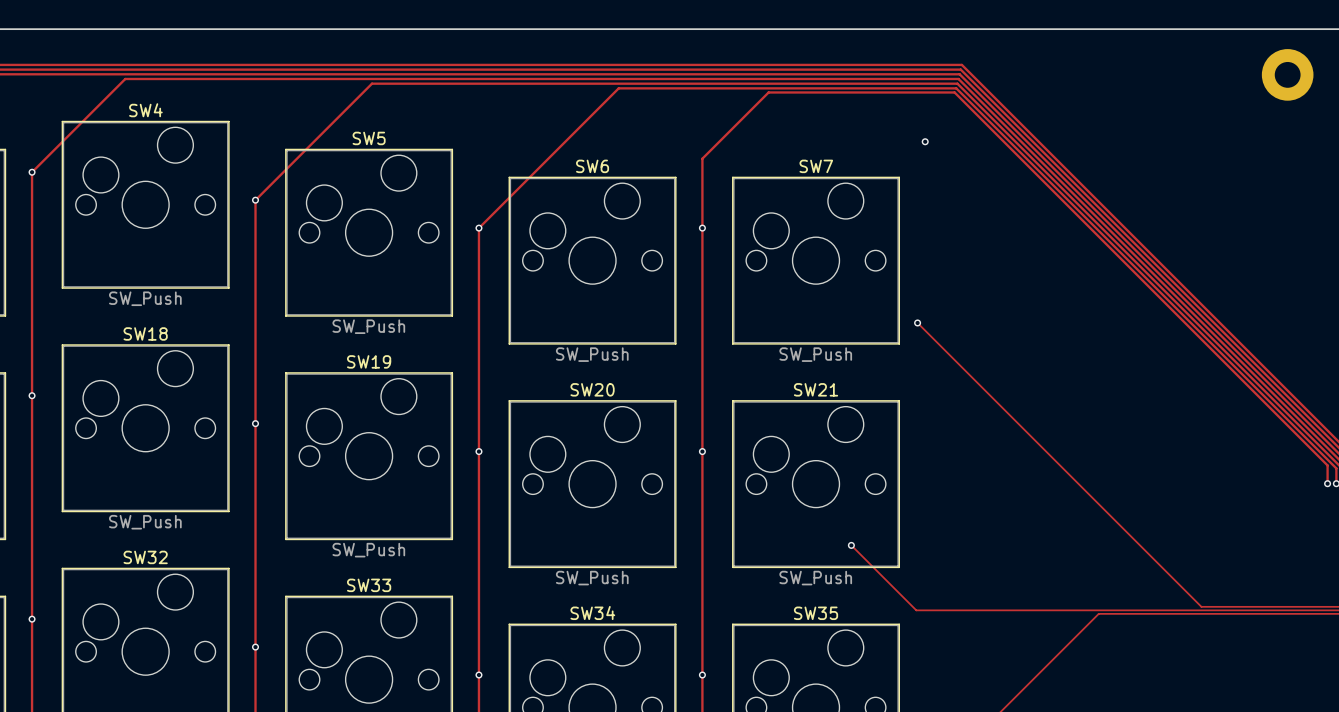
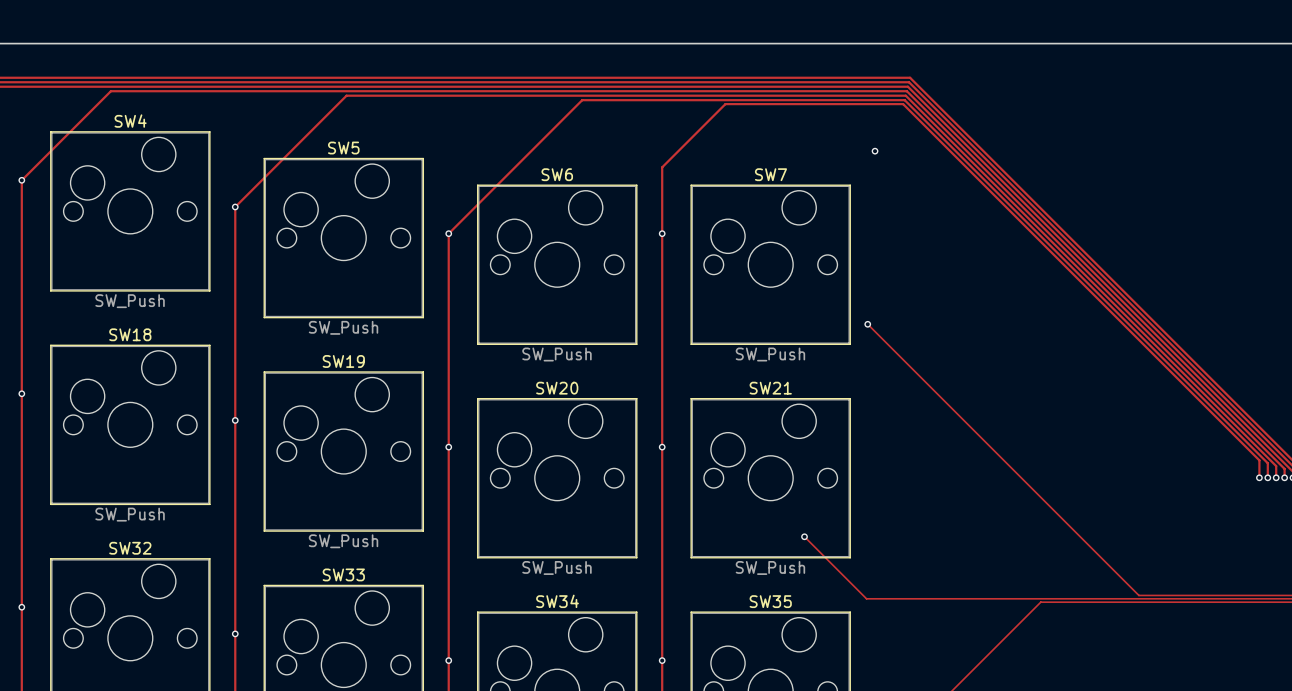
part: (1287, 74) -> none

